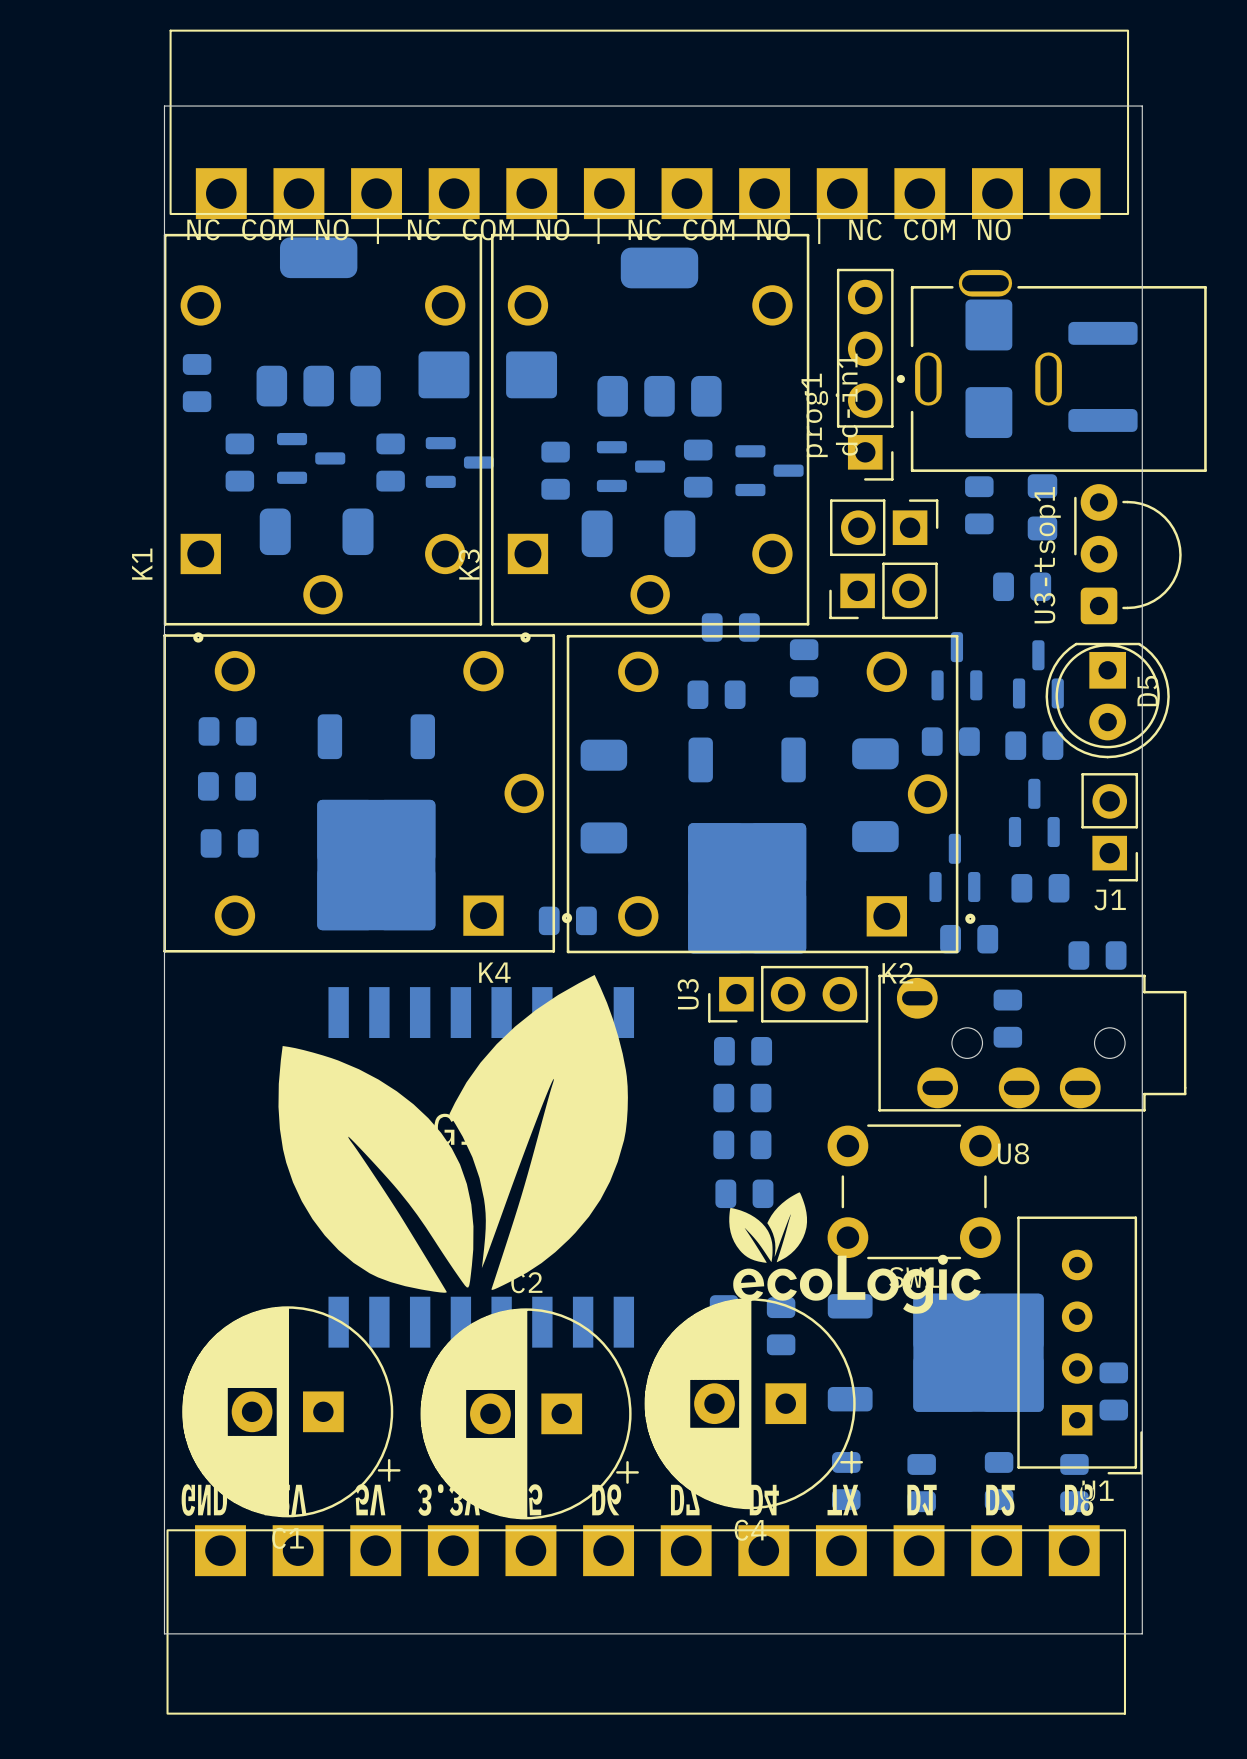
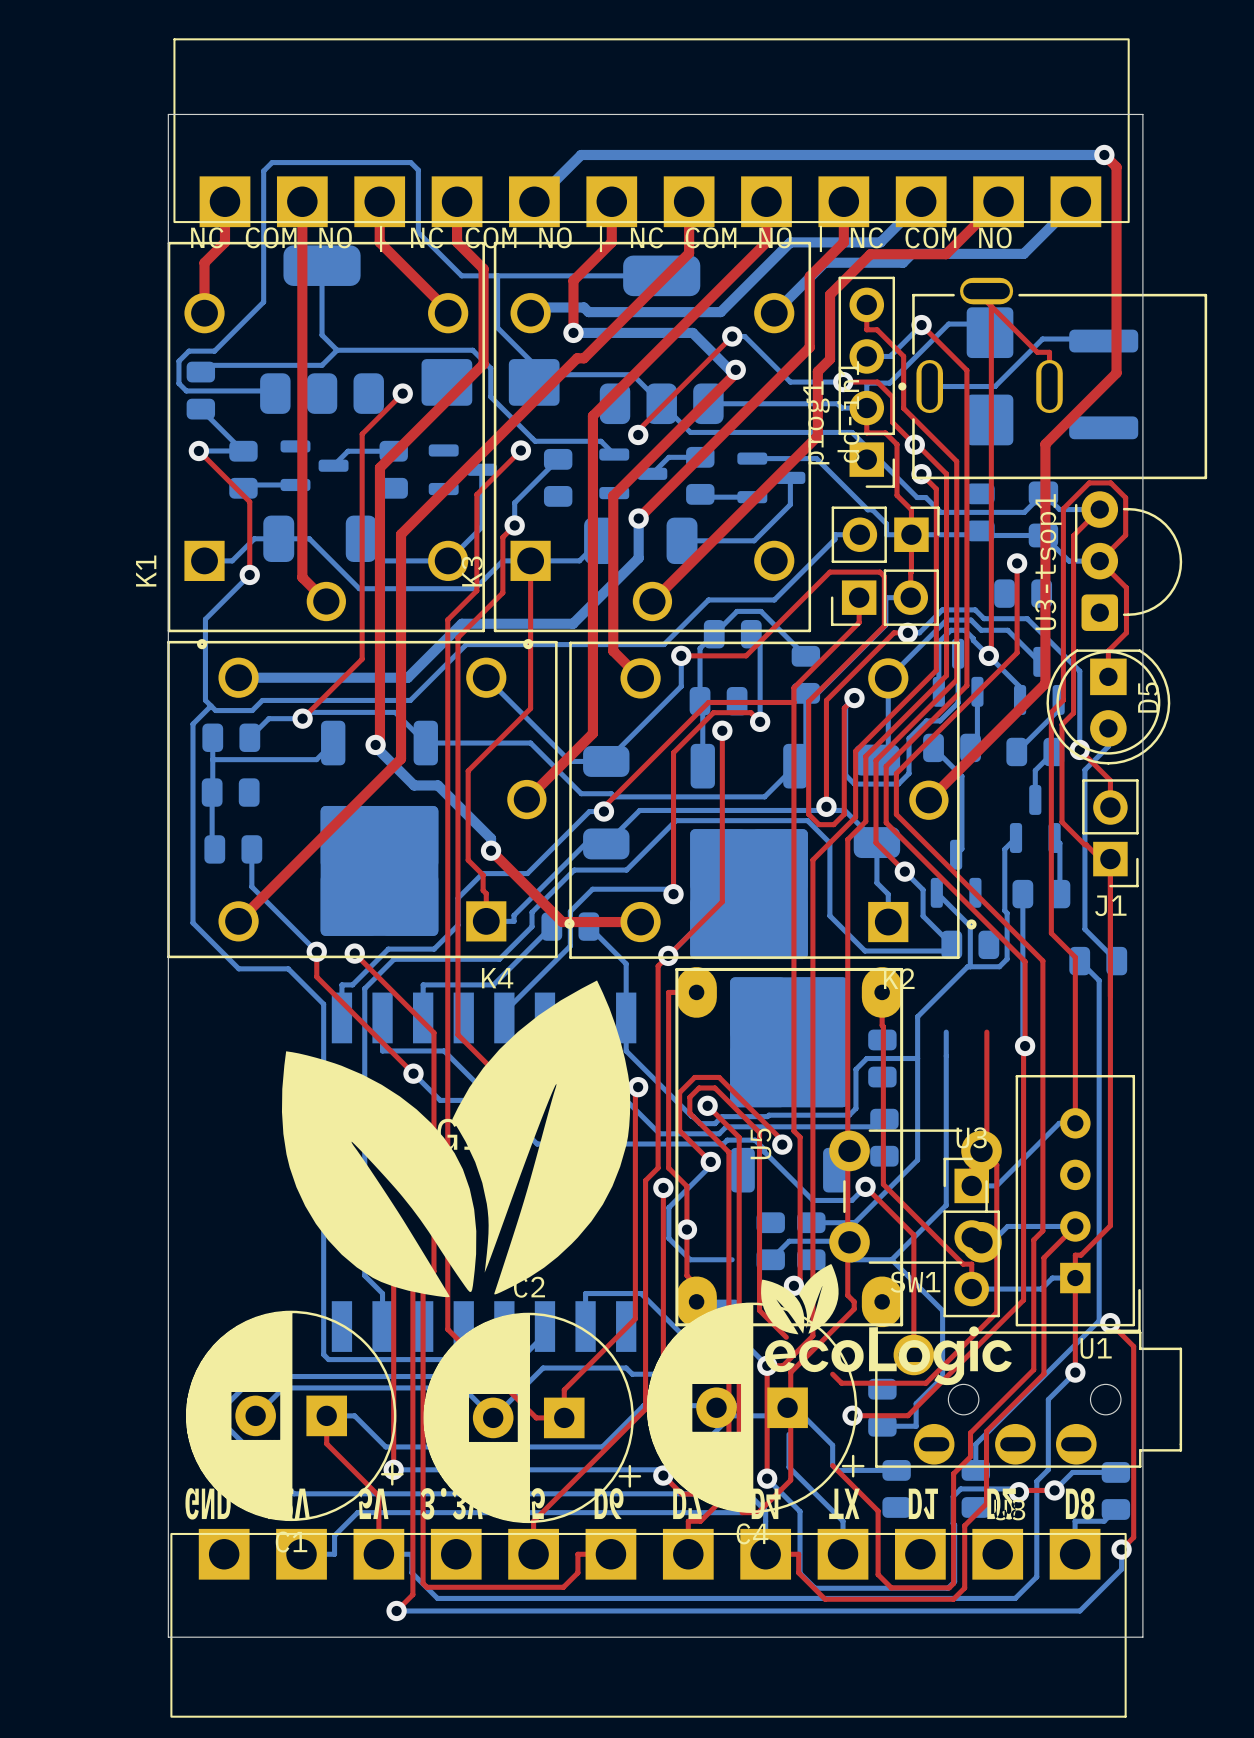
bottom track: none -> (1104, 154) (581, 154) (534, 201)
top track: none -> (1104, 154) (1116, 167) (1116, 373) (1045, 444) (1045, 683) (928, 800)
via: none -> (1104, 154)
top track: none -> (224, 201) (224, 242) (204, 262) (204, 313)
top track: none -> (302, 201) (302, 577) (326, 601)
top track: none -> (379, 201) (379, 242) (448, 310) (448, 313)
top track: none -> (457, 201) (457, 242) (483, 268) (483, 364) (379, 467) (379, 740) (375, 744)
top track: none -> (611, 201) (611, 242) (573, 280) (573, 332)
top track: none -> (689, 201) (689, 253) (584, 358) (577, 358) (401, 534) (401, 758) (238, 921)
top track: none -> (766, 201) (766, 242) (592, 415) (592, 733) (526, 799)
top track: none -> (843, 201) (843, 242) (809, 276) (809, 347) (638, 518)
bottom track: none -> (921, 201) (880, 242) (790, 242) (720, 312) (588, 312) (584, 307) (536, 307) (530, 313)
top track: none -> (998, 201) (946, 254) (870, 254) (830, 294) (830, 359) (817, 371) (817, 436) (652, 601)
bottom track: none -> (1075, 201) (1023, 253) (911, 253) (902, 262) (824, 262) (774, 313)
bottom track: none -> (322, 265) (322, 335) (337, 350)
bottom track: none -> (497, 275) (497, 327) (544, 374)
bottom track: none -> (661, 275) (461, 275) (418, 232) (418, 170) (410, 162) (272, 162) (263, 171) (263, 302) (214, 351) (189, 351) (178, 361) (178, 383) (186, 390) (272, 390) (275, 393)
top track: none -> (986, 291) (986, 301) (1037, 352) (1049, 352) (1049, 386)
top track: none -> (866, 304) (866, 329) (877, 329) (903, 356) (903, 408) (956, 461) (956, 679) (876, 760) (876, 842) (904, 871)
top track: none -> (991, 306) (991, 653) (988, 655)
bottom track: none -> (921, 325) (891, 356) (866, 356)
top track: none -> (921, 325) (966, 370) (966, 685) (886, 766) (886, 822) (1025, 961) (1023, 1300) (907, 1415) (852, 1415)
via: none -> (921, 325)
bottom track: none -> (990, 332) (990, 327) (986, 324) (948, 324) (889, 383) (866, 383) (866, 408) (841, 408) (837, 403) (708, 403)
bottom track: none -> (573, 332) (692, 332) (729, 369) (735, 369)
via: none -> (573, 332)
bottom track: none -> (732, 336) (744, 336) (790, 382) (843, 382)
top track: none -> (732, 336) (638, 430) (638, 434)
via: none -> (732, 336)
bottom track: none -> (1097, 339) (1042, 339) (995, 386) (929, 386)
bottom track: none -> (337, 350) (472, 350) (490, 368) (490, 396) (535, 441) (601, 441) (614, 454)
bottom track: none -> (337, 350) (322, 365) (207, 365) (200, 372)
top track: none -> (735, 369) (735, 373) (613, 495) (613, 651) (640, 678)
via: none -> (735, 369)
bottom track: none -> (534, 382) (541, 374) (632, 374) (690, 432) (852, 432) (917, 497) (925, 497) (940, 512) (1024, 512) (1043, 493) (1059, 509) (1099, 509)
top track: none -> (843, 382) (877, 382) (892, 397) (892, 422) (946, 474) (946, 675) (865, 756) (865, 821) (847, 839) (847, 1295) (854, 1301) (854, 1309) (790, 1372) (790, 1480) (758, 1512) (742, 1512)
via: none -> (843, 382)
top track: none -> (402, 393) (362, 434) (362, 659) (302, 718)
via: none -> (402, 393)
top track: none -> (866, 408) (866, 432) (885, 432) (897, 444) (897, 495) (911, 509) (910, 597)
bottom track: none -> (200, 409) (243, 451)
via: none -> (638, 434)
via: none -> (914, 444)
bottom track: none -> (198, 450) (243, 450)
top track: none -> (198, 450) (249, 501) (249, 574)
via: none -> (198, 450)
bottom track: none -> (393, 451) (348, 451) (333, 465)
top track: none -> (520, 450) (476, 494) (476, 590) (447, 619) (447, 1329) (536, 1417) (564, 1417) (564, 1389) (635, 1318) (635, 1089) (638, 1087)
via: none -> (520, 450)
bottom track: none -> (700, 457) (668, 457) (652, 473)
bottom track: none -> (752, 458) (816, 458) (867, 509) (872, 509) (886, 523) (886, 534) (976, 534) (980, 530) (985, 535) (1043, 535) (1069, 561) (1099, 561)
bottom track: none -> (558, 459) (514, 502) (514, 525)
bottom track: none -> (481, 469) (481, 527) (448, 560) (383, 560) (361, 538)
top track: none -> (921, 474) (936, 489) (936, 670) (855, 751) (855, 817) (812, 859) (812, 1335) (783, 1365) (767, 1365)
via: none -> (921, 474)
bottom track: none -> (790, 477) (790, 504) (754, 540) (682, 540)
bottom track: none -> (295, 484) (246, 484) (243, 488)
bottom track: none -> (700, 494) (703, 497) (752, 497)
top track: none -> (1099, 509) (1073, 535) (1073, 713) (1061, 724) (1061, 822) (1110, 868)
bottom track: none -> (638, 518) (638, 558) (573, 623) (461, 623) (407, 677) (238, 677)
via: none -> (638, 518)
top track: none -> (514, 525) (502, 537) (502, 592) (457, 637) (457, 1034) (517, 1094)
via: none -> (514, 525)
bottom track: none -> (859, 534) (834, 534) (834, 539) (774, 599) (708, 599) (663, 644) (466, 644) (410, 700) (262, 700) (252, 710) (215, 710) (205, 700) (205, 619) (249, 574)
bottom track: none -> (599, 540) (579, 560) (502, 560) (475, 588) (359, 588) (309, 538) (254, 538) (232, 560) (204, 560)
top track: none -> (530, 560) (530, 708) (468, 771) (468, 860) (483, 875) (483, 890) (486, 893) (486, 921)
top track: none -> (1017, 563) (1017, 652) (896, 773) (896, 814) (1042, 960) (1042, 1230) (1033, 1239) (1033, 1369) (970, 1433) (970, 1456) (953, 1473) (953, 1583) (949, 1587) (891, 1587) (878, 1574) (878, 1511) (832, 1465)
via: none -> (1017, 563)
via: none -> (249, 574)
top track: none -> (859, 597) (859, 622) (793, 687) (793, 1131) (800, 1137) (800, 1279) (793, 1285)
bottom track: none -> (910, 597) (885, 597) (885, 625) (817, 693) (805, 693) (805, 755) (764, 796) (614, 796) (611, 793) (581, 793) (530, 743) (425, 743) (395, 712) (308, 712) (302, 718) (268, 718) (249, 737)
bottom track: none -> (907, 632) (919, 632) (942, 609) (975, 609) (984, 618) (1027, 618) (1079, 671) (1079, 749)
top track: none -> (907, 632) (894, 632) (826, 700) (826, 806)
via: none -> (907, 632)
bottom track: none -> (751, 634) (760, 643) (760, 721)
bottom track: none -> (958, 653) (958, 702) (939, 720) (926, 720) (909, 738) (909, 773) (898, 784) (854, 784) (845, 775) (845, 706) (854, 698)
bottom track: none -> (681, 655) (681, 686) (606, 761) (570, 761) (486, 677)
top track: none -> (681, 655) (746, 655) (829, 572) (879, 572) (884, 576) (884, 625) (808, 701) (808, 814) (819, 824) (833, 824) (844, 814) (844, 708) (854, 698)
via: none -> (681, 655)
bottom track: none -> (805, 656) (760, 611) (737, 611) (700, 648) (702, 766)
via: none -> (988, 655)
bottom track: none -> (1039, 661) (1007, 630) (981, 630) (971, 620) (946, 620) (888, 678) (888, 748) (876, 760)
top track: none -> (1108, 676) (1108, 650) (1126, 632) (1126, 587) (1099, 561) (1125, 535) (1125, 497) (1110, 482) (1089, 482) (1063, 508) (1063, 700) (1051, 712) (1051, 933) (1075, 957) (1075, 1123)
bottom track: none -> (938, 691) (938, 642) (950, 630) (964, 630) (1020, 687) (1020, 699)
bottom track: none -> (977, 691) (977, 741) (970, 747)
via: none -> (854, 698)
bottom track: none -> (1058, 699) (1058, 710) (1016, 751)
top track: none -> (793, 702) (708, 702) (603, 807) (603, 811)
bottom track: none -> (211, 705) (192, 724) (192, 923) (238, 968) (288, 968) (323, 1004) (323, 1354) (328, 1359) (504, 1359) (504, 1326)
via: none -> (302, 718)
top track: none -> (760, 721) (750, 712) (713, 712) (673, 752) (673, 894)
via: none -> (760, 721)
bottom track: none -> (1108, 728) (1108, 746) (1084, 769) (1084, 929) (1116, 961)
top track: none -> (722, 730) (722, 901) (658, 966) (658, 1168) (645, 1180) (645, 1409) (533, 1521) (533, 1554)
via: none -> (722, 730)
bottom track: none -> (212, 737) (212, 846) (214, 849)
bottom track: none -> (333, 743) (316, 759) (212, 759)
bottom track: none -> (375, 744) (414, 785) (437, 785) (491, 838) (491, 850)
via: none -> (375, 744)
bottom track: none -> (933, 747) (961, 776) (961, 848) (956, 854)
top track: none -> (1079, 749) (1110, 780) (1110, 807)
via: none -> (1079, 749)
bottom track: none -> (1053, 751) (1035, 770) (1035, 799)
via: none -> (826, 806)
bottom track: none -> (603, 811) (589, 811) (527, 873) (482, 873) (458, 898) (458, 925) (434, 949) (388, 949) (352, 984) (341, 984) (341, 1017)
via: none -> (603, 811)
bottom track: none -> (1016, 838) (1004, 849) (1007, 959) (999, 966) (967, 966) (917, 1016) (917, 1159) (854, 1222) (811, 1222)
bottom track: none -> (1054, 838) (1059, 843) (1059, 894)
bottom track: none -> (251, 849) (251, 886) (316, 951)
top track: none -> (491, 850) (562, 922) (640, 922)
via: none -> (491, 850)
top track: none -> (1110, 859) (1110, 1225) (1081, 1255) (1075, 1255) (1075, 1372)
bottom track: none -> (904, 871) (923, 889) (923, 916) (951, 944) (945, 951) (865, 951) (829, 915) (829, 842) (807, 820) (675, 820) (626, 870) (574, 870) (532, 912) (532, 926) (499, 959) (394, 959) (364, 988) (364, 1275) (382, 1293) (382, 1326)
via: none -> (904, 871)
bottom track: none -> (936, 892) (970, 926) (970, 966)
bottom track: none -> (673, 894) (668, 889) (592, 889) (570, 911) (570, 946) (504, 1012) (504, 1017)
via: none -> (673, 894)
bottom track: none -> (1022, 894) (1022, 1043) (1025, 1046)
bottom track: none -> (486, 921) (514, 921) (514, 915) (585, 843) (606, 843) (639, 810) (844, 810) (876, 842) (876, 882) (888, 894) (888, 922)
bottom track: none -> (551, 926) (493, 984) (423, 984) (423, 1017)
bottom track: none -> (588, 926) (626, 963) (626, 1050) (700, 1123) (714, 1123) (722, 1116) (849, 1115) (855, 1108) (855, 1069) (866, 1058) (917, 1058)
top track: none -> (316, 951) (316, 976) (413, 1073)
via: none -> (316, 951)
top track: none -> (354, 953) (433, 1032) (433, 1271) (423, 1282) (423, 1583) (426, 1587) (563, 1587) (577, 1572) (577, 1554) (610, 1554)
via: none -> (354, 953)
via: none -> (668, 955)
bottom track: none -> (1079, 961) (1099, 980) (1099, 1320)
top track: none -> (696, 992) (668, 992) (668, 1168) (686, 1186) (686, 1275) (696, 1285) (696, 1334) (700, 1338) (700, 1374)
top track: none -> (882, 992) (883, 1184) (963, 1264) (971, 1264) (971, 1289)
U3 rotation: 0° (788, 994) -> 90° clockwise (971, 1237)
U3 position: (788, 994) -> (971, 1237)
bottom track: none -> (382, 1017) (382, 1050) (444, 1050) (537, 1144) (723, 1144) (727, 1140) (755, 1140) (812, 1200) (851, 1200) (865, 1186)
bottom track: none -> (585, 1017) (585, 1059) (659, 1133) (719, 1133) (726, 1126) (876, 1126) (884, 1119)
part: (1007, 1018) -> none
bottom track: none -> (946, 1032) (946, 1205) (891, 1259)
top track: none -> (986, 1032) (986, 1160)
via: none -> (1025, 1046)
U8 position: (1032, 1043) -> (1028, 1399)
part: (743, 1051) -> none
part: none -> (882, 1058)
bottom track: none -> (413, 1073) (440, 1100) (468, 1100)
via: none -> (413, 1073)
via: none -> (638, 1087)
part: (742, 1098) -> none
top track: none -> (707, 1105) (739, 1137) (739, 1482) (700, 1521) (688, 1521) (688, 1554)
via: none -> (707, 1105)
bottom track: none -> (1075, 1123) (1059, 1123) (996, 1185) (971, 1185)
part: none -> (884, 1137)
top track: none -> (782, 1144) (782, 1140) (719, 1077) (694, 1077) (679, 1092) (679, 1130) (710, 1161)
via: none -> (782, 1144)
U5: none -> (789, 1147)
part: (742, 1144) -> none
top track: none -> (986, 1160) (992, 1160) (996, 1164) (996, 1312) (926, 1383) (841, 1383) (832, 1374)
bottom track: none -> (710, 1161) (710, 1165) (668, 1207) (668, 1238) (690, 1259) (732, 1259)
via: none -> (710, 1161)
top track: none -> (865, 1186) (913, 1235) (913, 1354)
via: none -> (865, 1186)
top track: none -> (663, 1187) (663, 1428) (700, 1465)
via: none -> (663, 1187)
part: (744, 1193) -> none
top track: none -> (344, 1209) (393, 1259) (393, 1469)
bottom track: none -> (1075, 1226) (1007, 1226) (996, 1237) (971, 1237)
top track: none -> (1075, 1226) (1043, 1257) (1043, 1373) (986, 1431) (986, 1503) (964, 1525) (964, 1588) (953, 1599) (825, 1599) (798, 1572) (798, 1554) (765, 1554)
via: none -> (686, 1229)
part: none -> (770, 1241)
part: none -> (811, 1241)
drawing position: (855, 1253) -> (886, 1324)
bottom track: none -> (770, 1259) (789, 1241) (833, 1241) (851, 1259) (891, 1259)
bottom track: none -> (891, 1259) (942, 1310) (942, 1377) (916, 1403) (916, 1426) (882, 1426)
top track: none -> (416, 1264) (412, 1267) (412, 1594) (396, 1610)
bottom track: none -> (1075, 1278) (1052, 1278) (1041, 1289) (971, 1289)
via: none -> (793, 1285)
bottom track: none -> (1099, 1320) (975, 1444) (975, 1470)
top track: none -> (1110, 1323) (1133, 1346) (1133, 1537) (1121, 1549)
via: none -> (1110, 1323)
bottom track: none -> (544, 1326) (544, 1334) (503, 1376) (254, 1376) (227, 1403) (227, 1427) (293, 1493) (748, 1493) (765, 1511) (765, 1554)
bottom track: none -> (585, 1326) (585, 1293) (641, 1293) (684, 1336) (738, 1336) (767, 1365)
part: (781, 1326) -> none
top track: none -> (786, 1337) (759, 1310) (759, 1132) (714, 1087) (699, 1087) (689, 1097) (689, 1113) (728, 1152) (728, 1477) (711, 1494) (681, 1494) (663, 1475)
U1 position: (1080, 1345) -> (1078, 1203)
part rotation: 0° (935, 1352) -> 90° counterclockwise (788, 1084)
part position: (935, 1352) -> (788, 1084)
top track: none -> (767, 1365) (767, 1478)
via: none -> (767, 1365)
bottom track: none -> (1075, 1372) (1048, 1399) (1048, 1469) (1036, 1481) (1036, 1576) (1015, 1598) (437, 1598) (411, 1572) (411, 1554) (378, 1554)
via: none -> (1075, 1372)
bottom track: none -> (700, 1374) (632, 1374) (626, 1368) (543, 1368) (493, 1417) (463, 1387) (283, 1387) (255, 1415)
part: (1113, 1391) -> none
bottom track: none -> (746, 1397) (738, 1405) (643, 1405) (602, 1446) (385, 1446) (354, 1415) (326, 1415)
part: none -> (882, 1407)
top track: none -> (326, 1415) (326, 1443) (378, 1496) (378, 1554)
via: none -> (852, 1415)
bottom track: none -> (789, 1434) (789, 1467) (843, 1521) (843, 1554)
bottom track: none -> (700, 1465) (700, 1446) (731, 1415) (803, 1415) (832, 1445) (832, 1465) (837, 1470) (896, 1470)
bottom track: none -> (393, 1469) (657, 1469) (663, 1475)
via: none -> (393, 1469)
bottom track: none -> (1115, 1472) (1072, 1472) (1054, 1490)
via: none -> (663, 1475)
bottom track: none -> (767, 1478) (800, 1511) (800, 1573) (815, 1588) (948, 1588) (954, 1581) (953, 1496) (960, 1488) (1015, 1488) (1018, 1492)
via: none -> (767, 1478)
part: (846, 1481) -> none
part position: (999, 1481) -> (975, 1488)
part: (921, 1483) -> none
part position: (1074, 1483) -> (1115, 1490)
part: none -> (896, 1488)
top track: none -> (1054, 1490) (1020, 1490) (1018, 1492)
via: none -> (1054, 1490)
via: none -> (1018, 1492)
bottom track: none -> (1115, 1509) (1104, 1521) (1075, 1521) (1075, 1554)
bottom track: none -> (742, 1512) (357, 1512) (334, 1535) (334, 1554) (301, 1554)
bottom track: none -> (1121, 1549) (1121, 1569) (1079, 1610) (396, 1610)
via: none -> (1121, 1549)
via: none -> (396, 1610)

